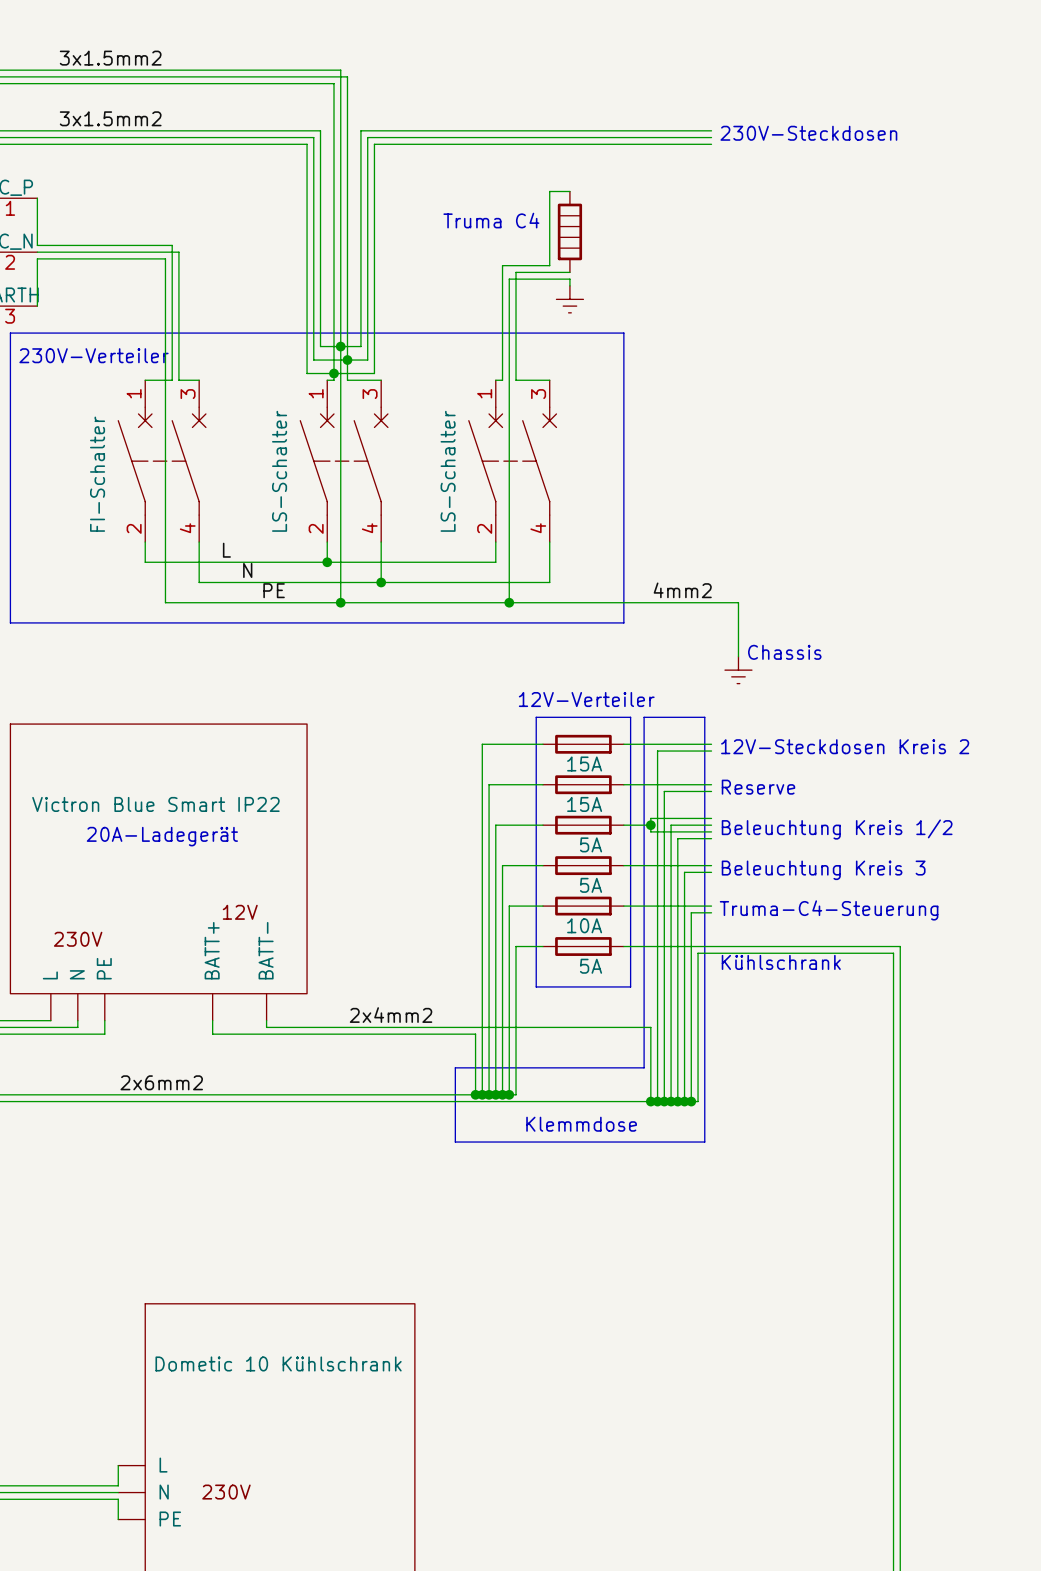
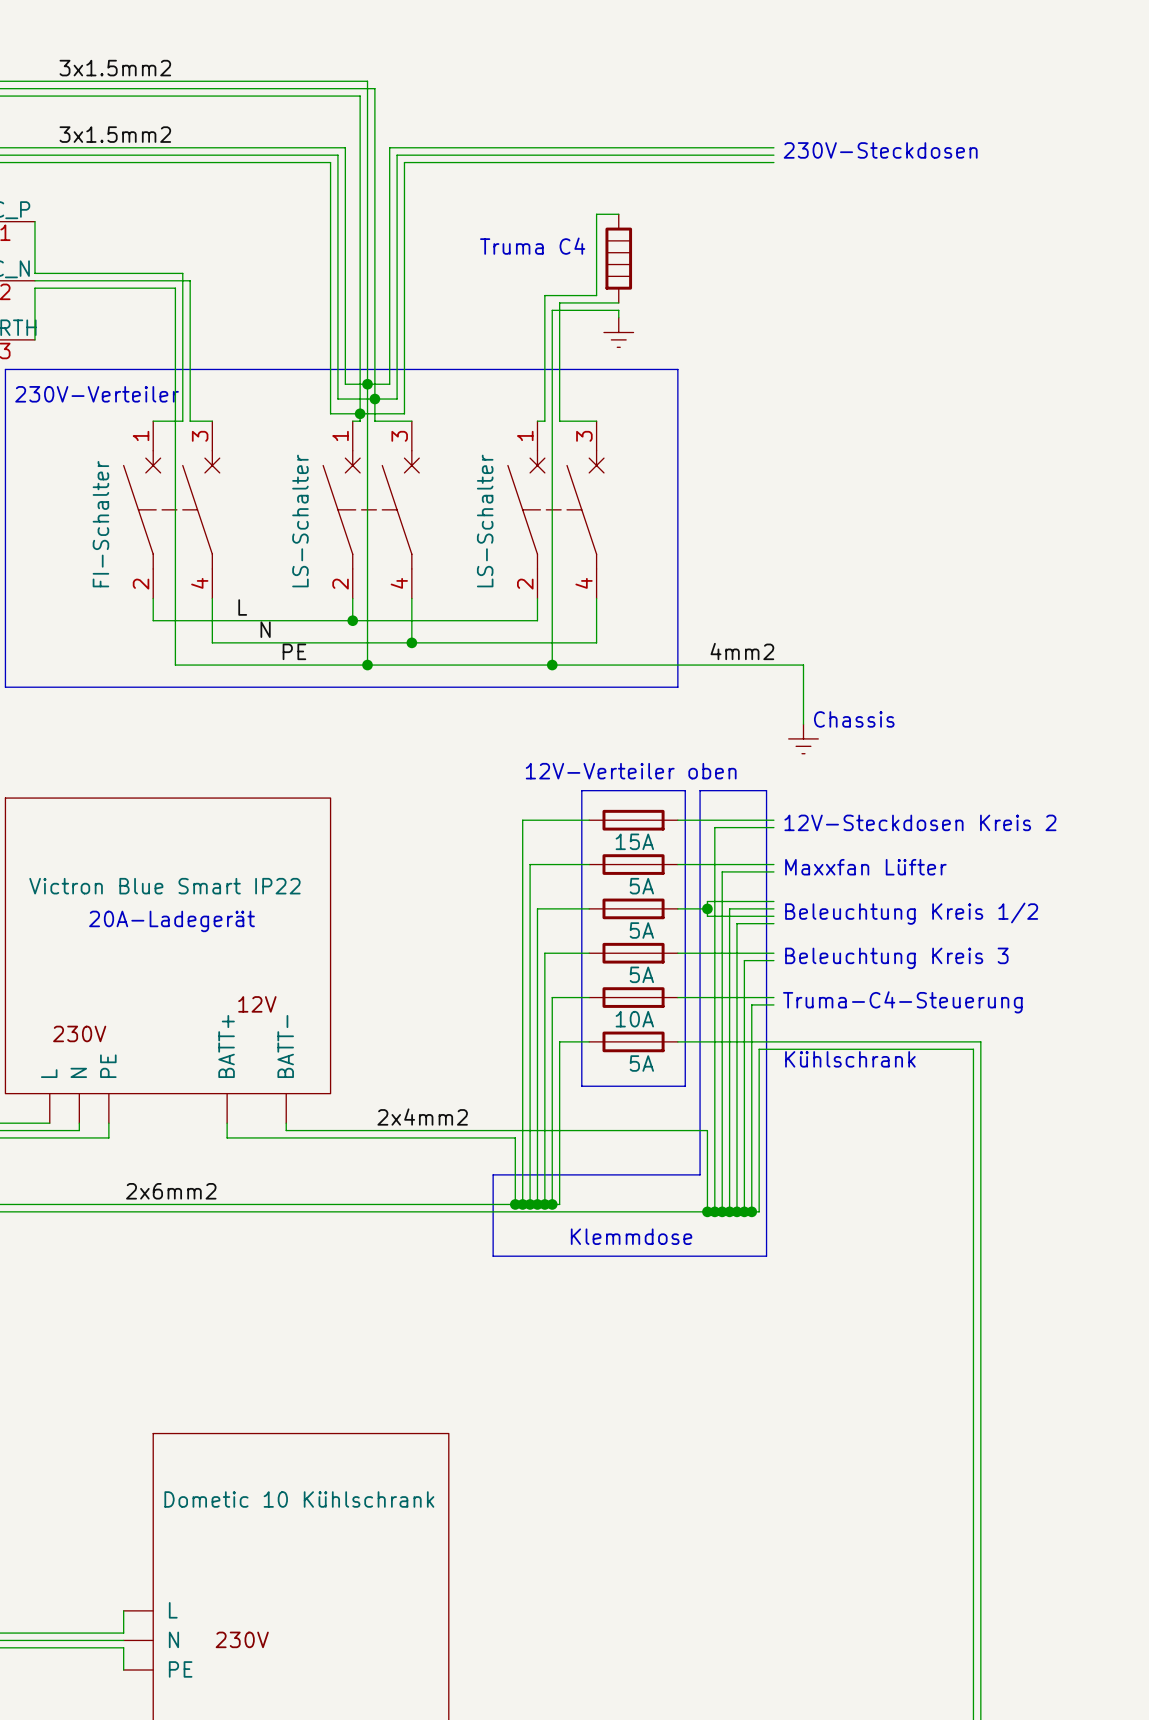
text: 12V-Verteiler (586, 699) -> 12V-Verteiler oben (631, 771)
text: Reserve (758, 787) -> Maxxfan Lüfter (865, 867)
part value: 15A (584, 804) -> 5A (641, 886)

